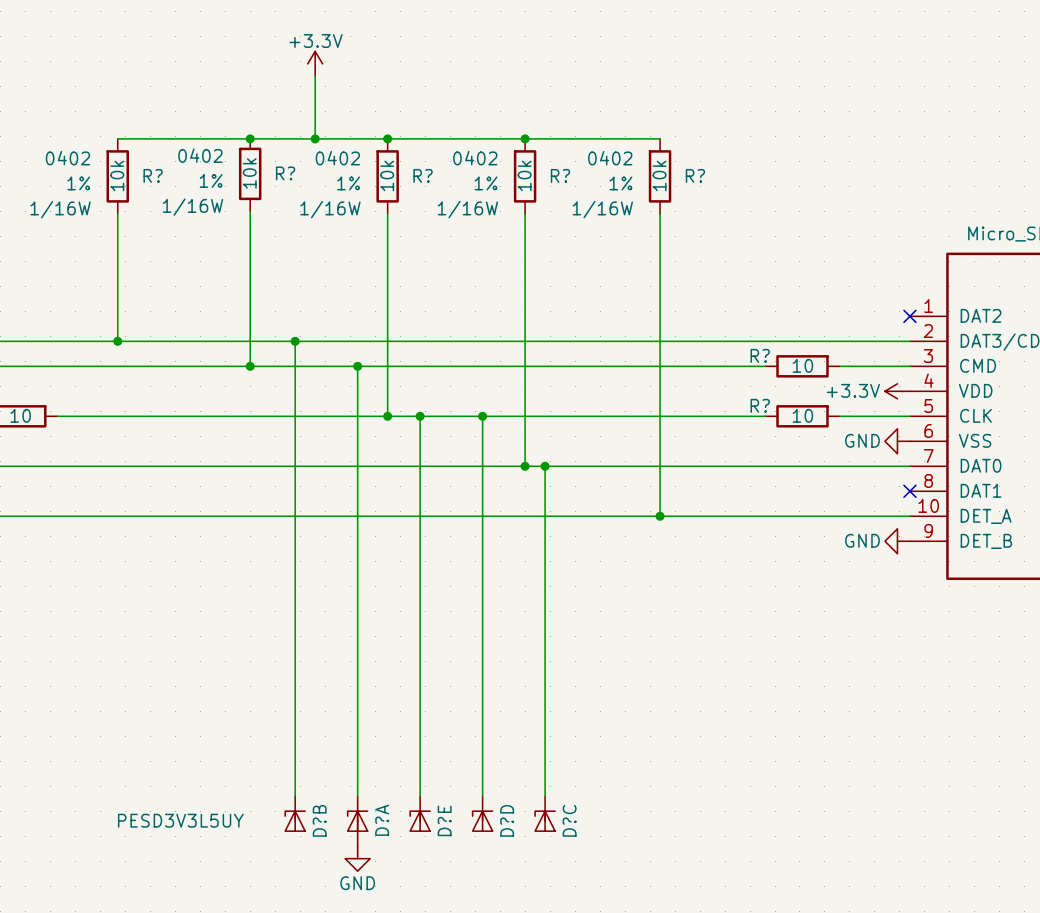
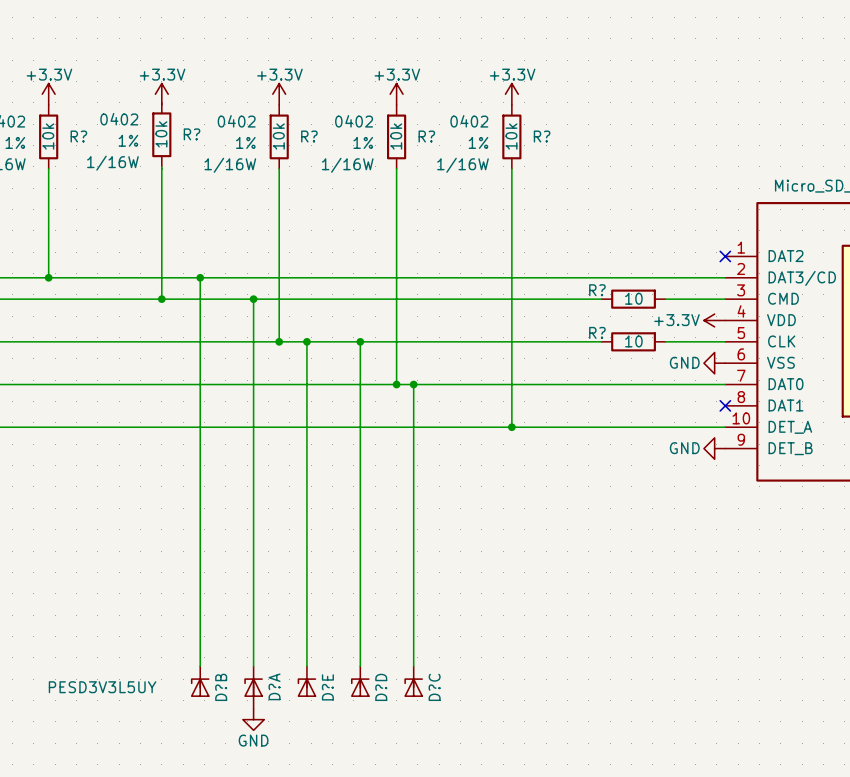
power symbol: +3.3V (315, 63) -> none
wire: (315, 76) (315, 138) -> none
power symbol: none -> +3.3V (48, 94)
power symbol: none -> +3.3V (161, 94)
power symbol: none -> +3.3V (279, 94)
power symbol: none -> +3.3V (396, 94)
power symbol: none -> +3.3V (511, 94)
wire: (117, 138) (660, 138) -> none
junction: (250, 138) -> none
junction: (315, 138) -> none
junction: (387, 138) -> none
junction: (525, 138) -> none

